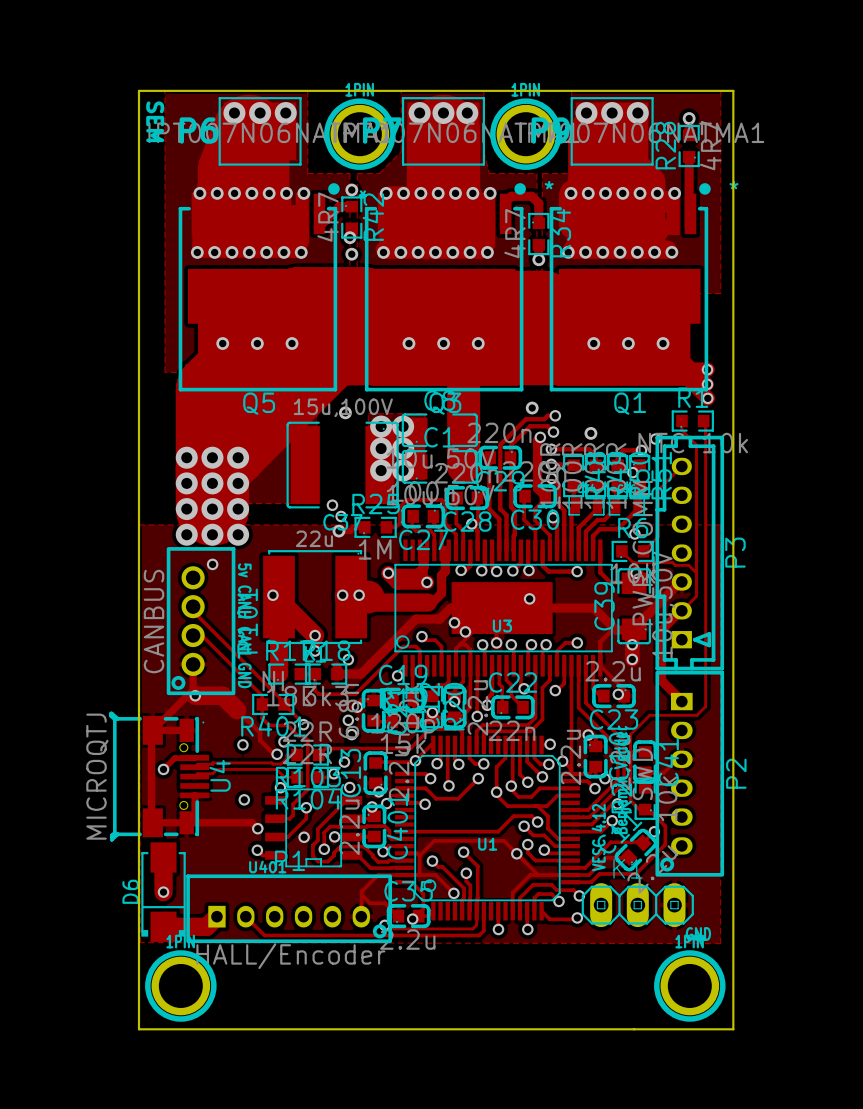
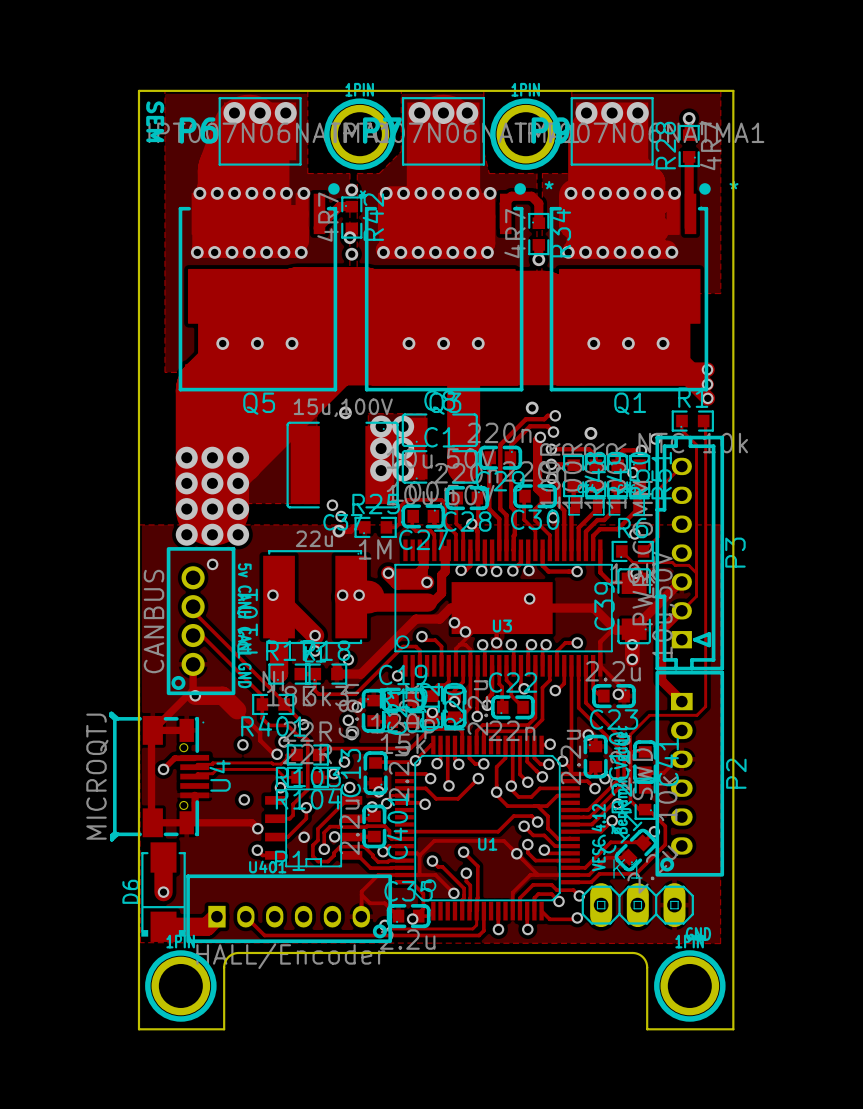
board edge: (224, 1029) (647, 1029) -> (224, 1029) (224, 964) (229, 956) (238, 952) (635, 953) (644, 958) (647, 965) (647, 1029)

